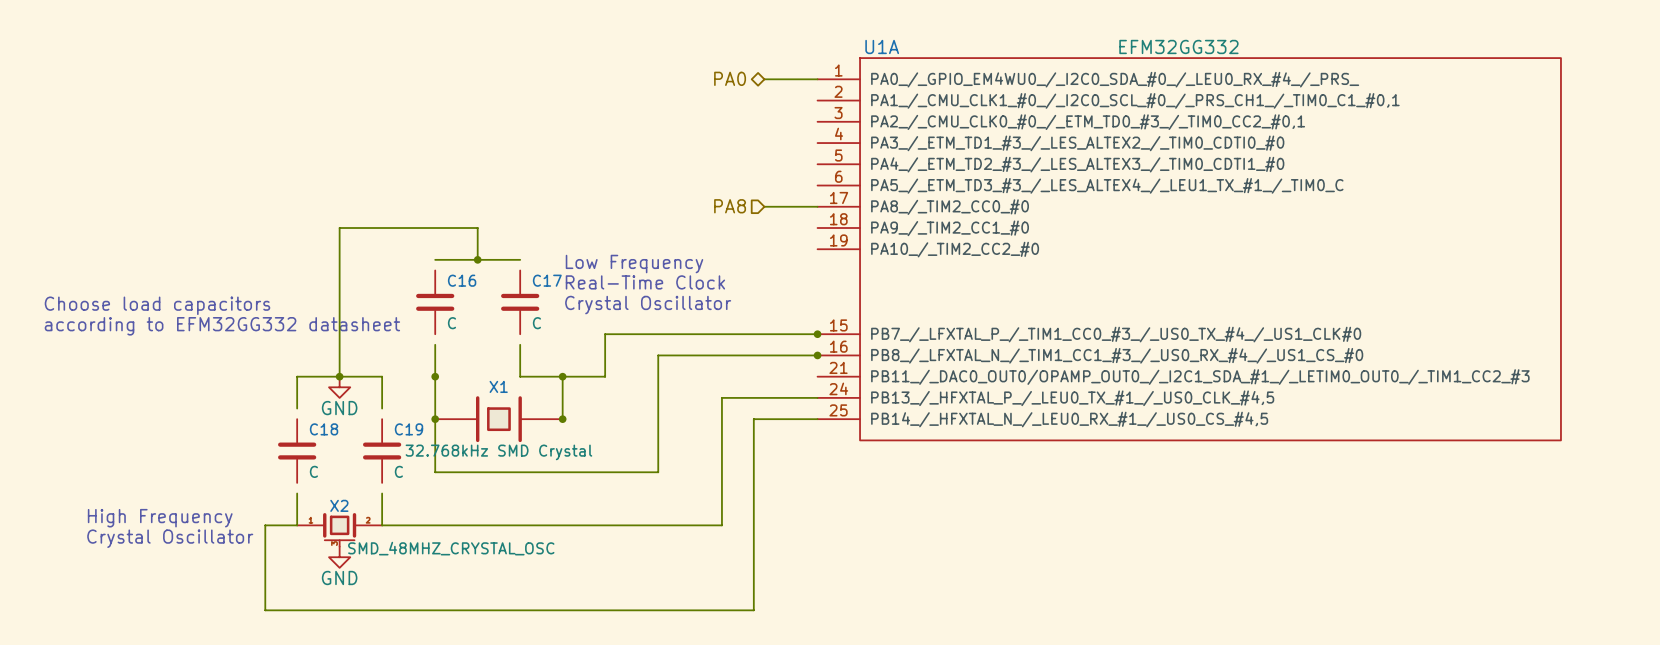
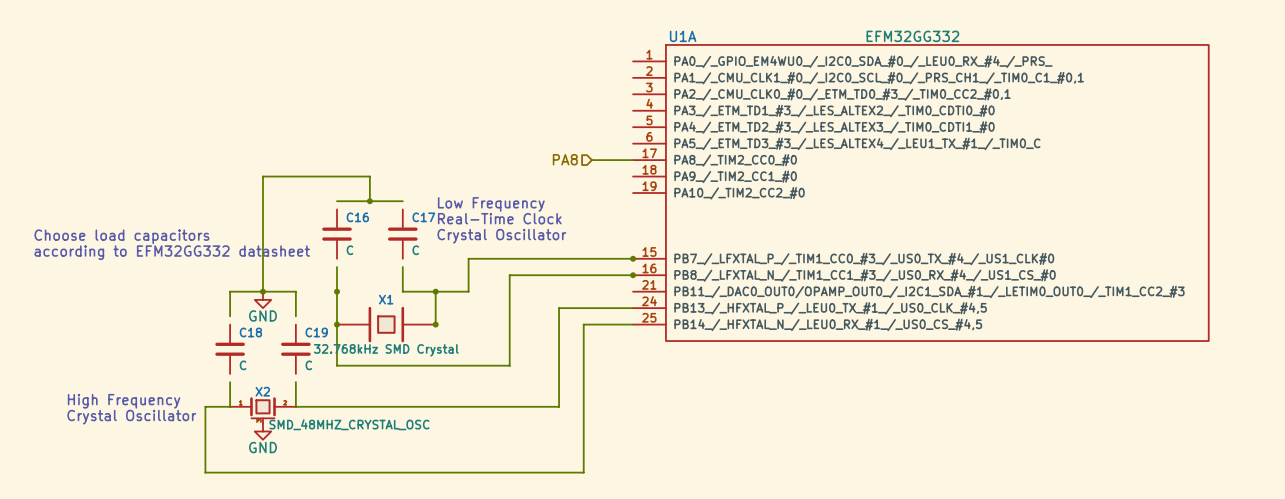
hierarchical label: PA0 (730, 78) -> none
wire: (764, 79) (817, 79) -> none

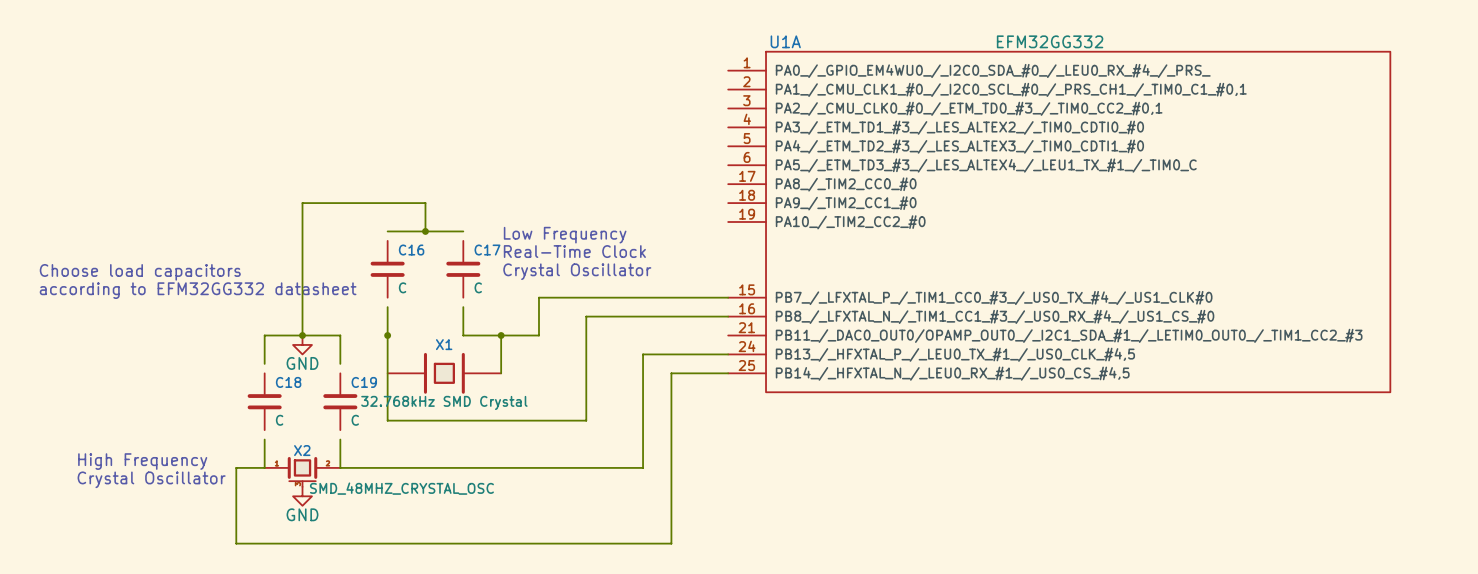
hierarchical label: PA8 (565, 159) -> none
wire: (591, 160) (633, 160) -> none
junction: (633, 258) -> none
junction: (633, 275) -> none
junction: (337, 324) -> none
junction: (435, 324) -> none

